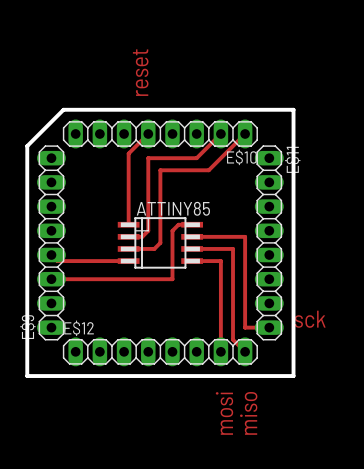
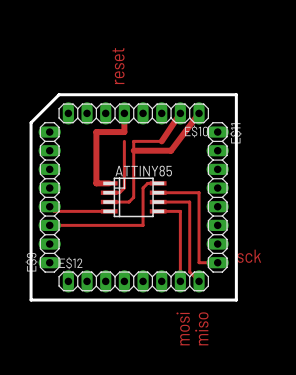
track: (148, 133) (128, 153) (128, 224) -> (124, 113) (124, 132) (96, 132) (96, 183) (109, 183)
track: (220, 133) (196, 158) (148, 158) (148, 170) -> none
track: (245, 133) (208, 170) (196, 170) -> (180, 113) (161, 141)
track: none -> (199, 113) (171, 150) (133, 150)

